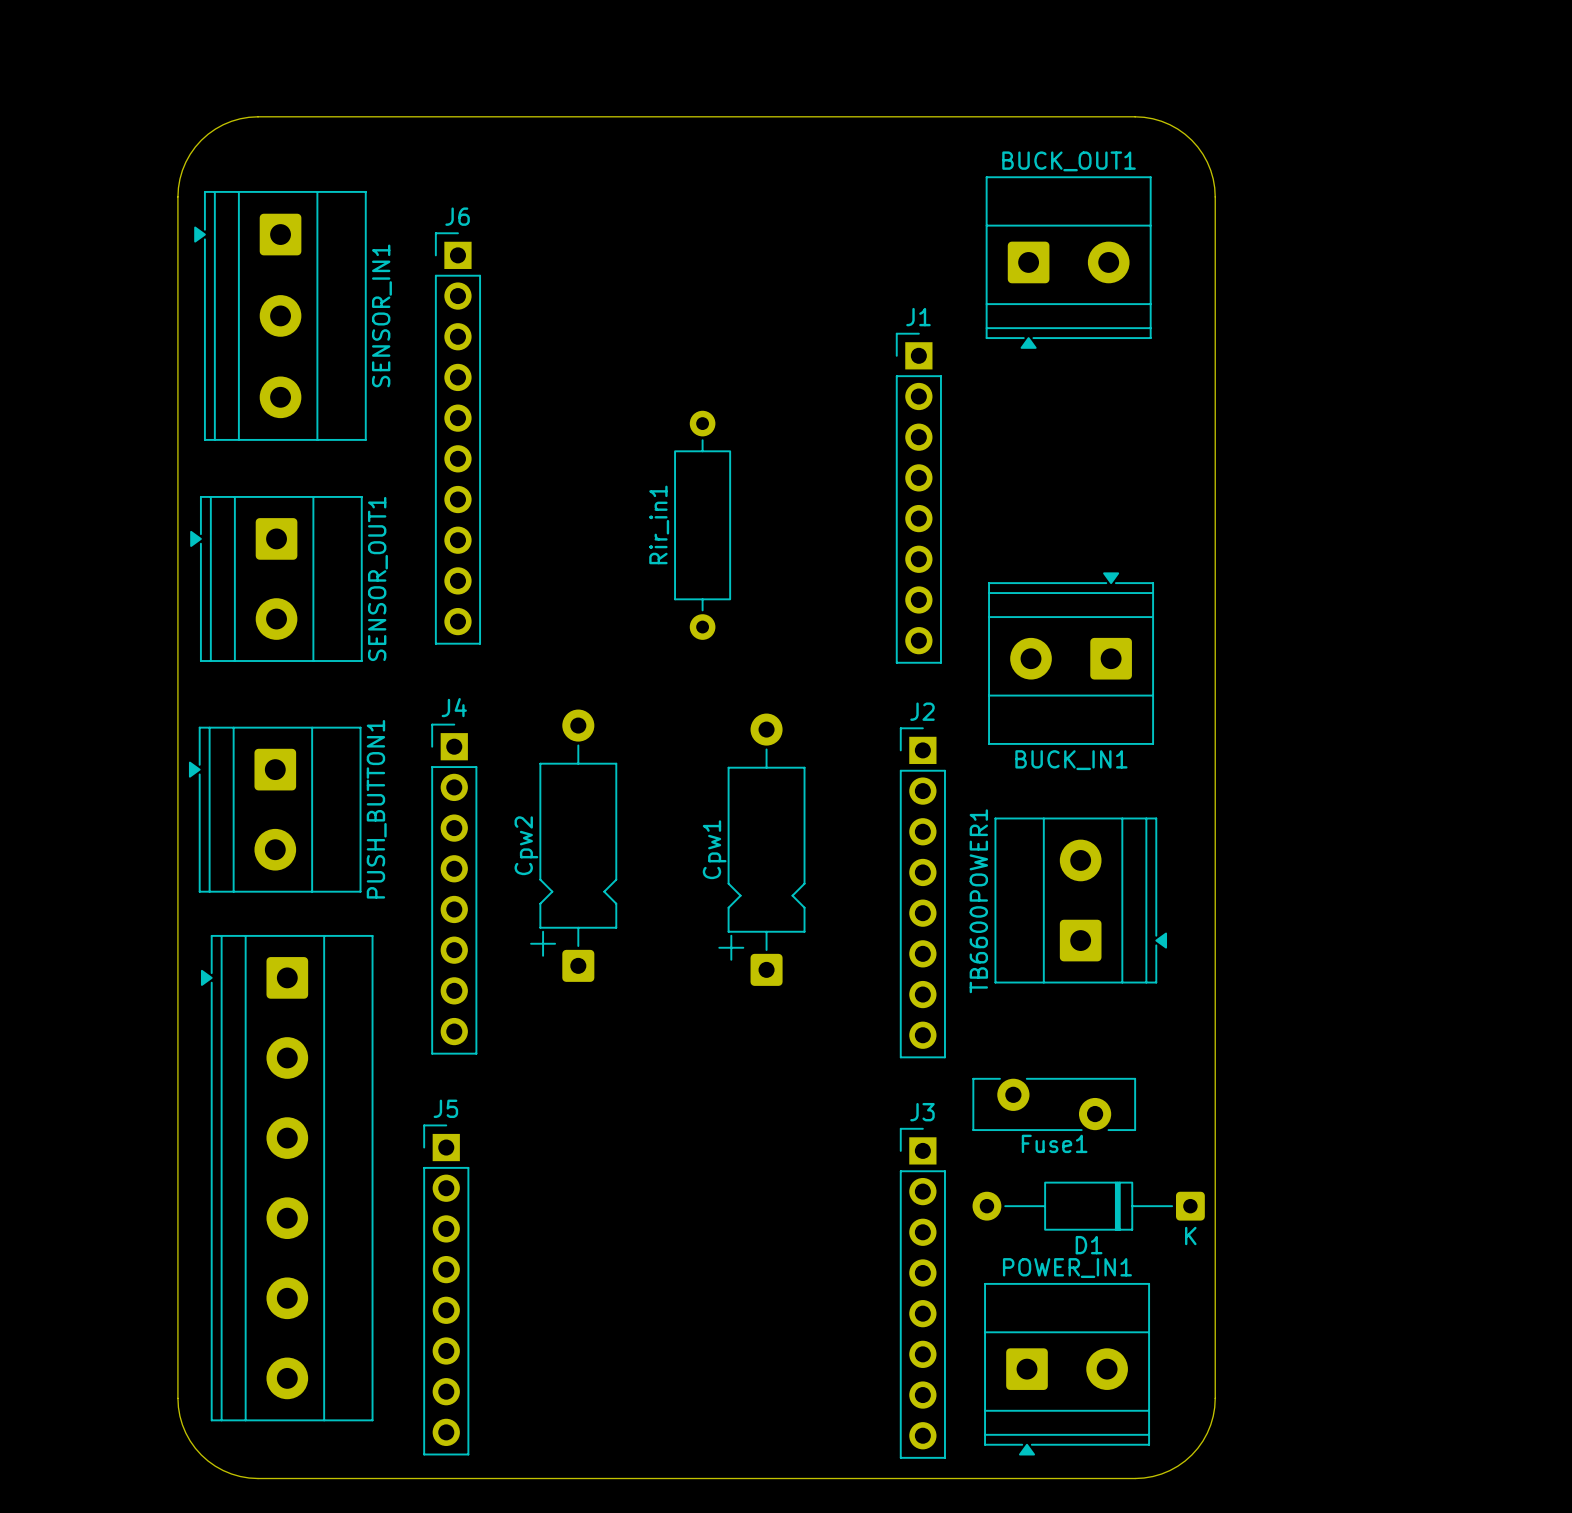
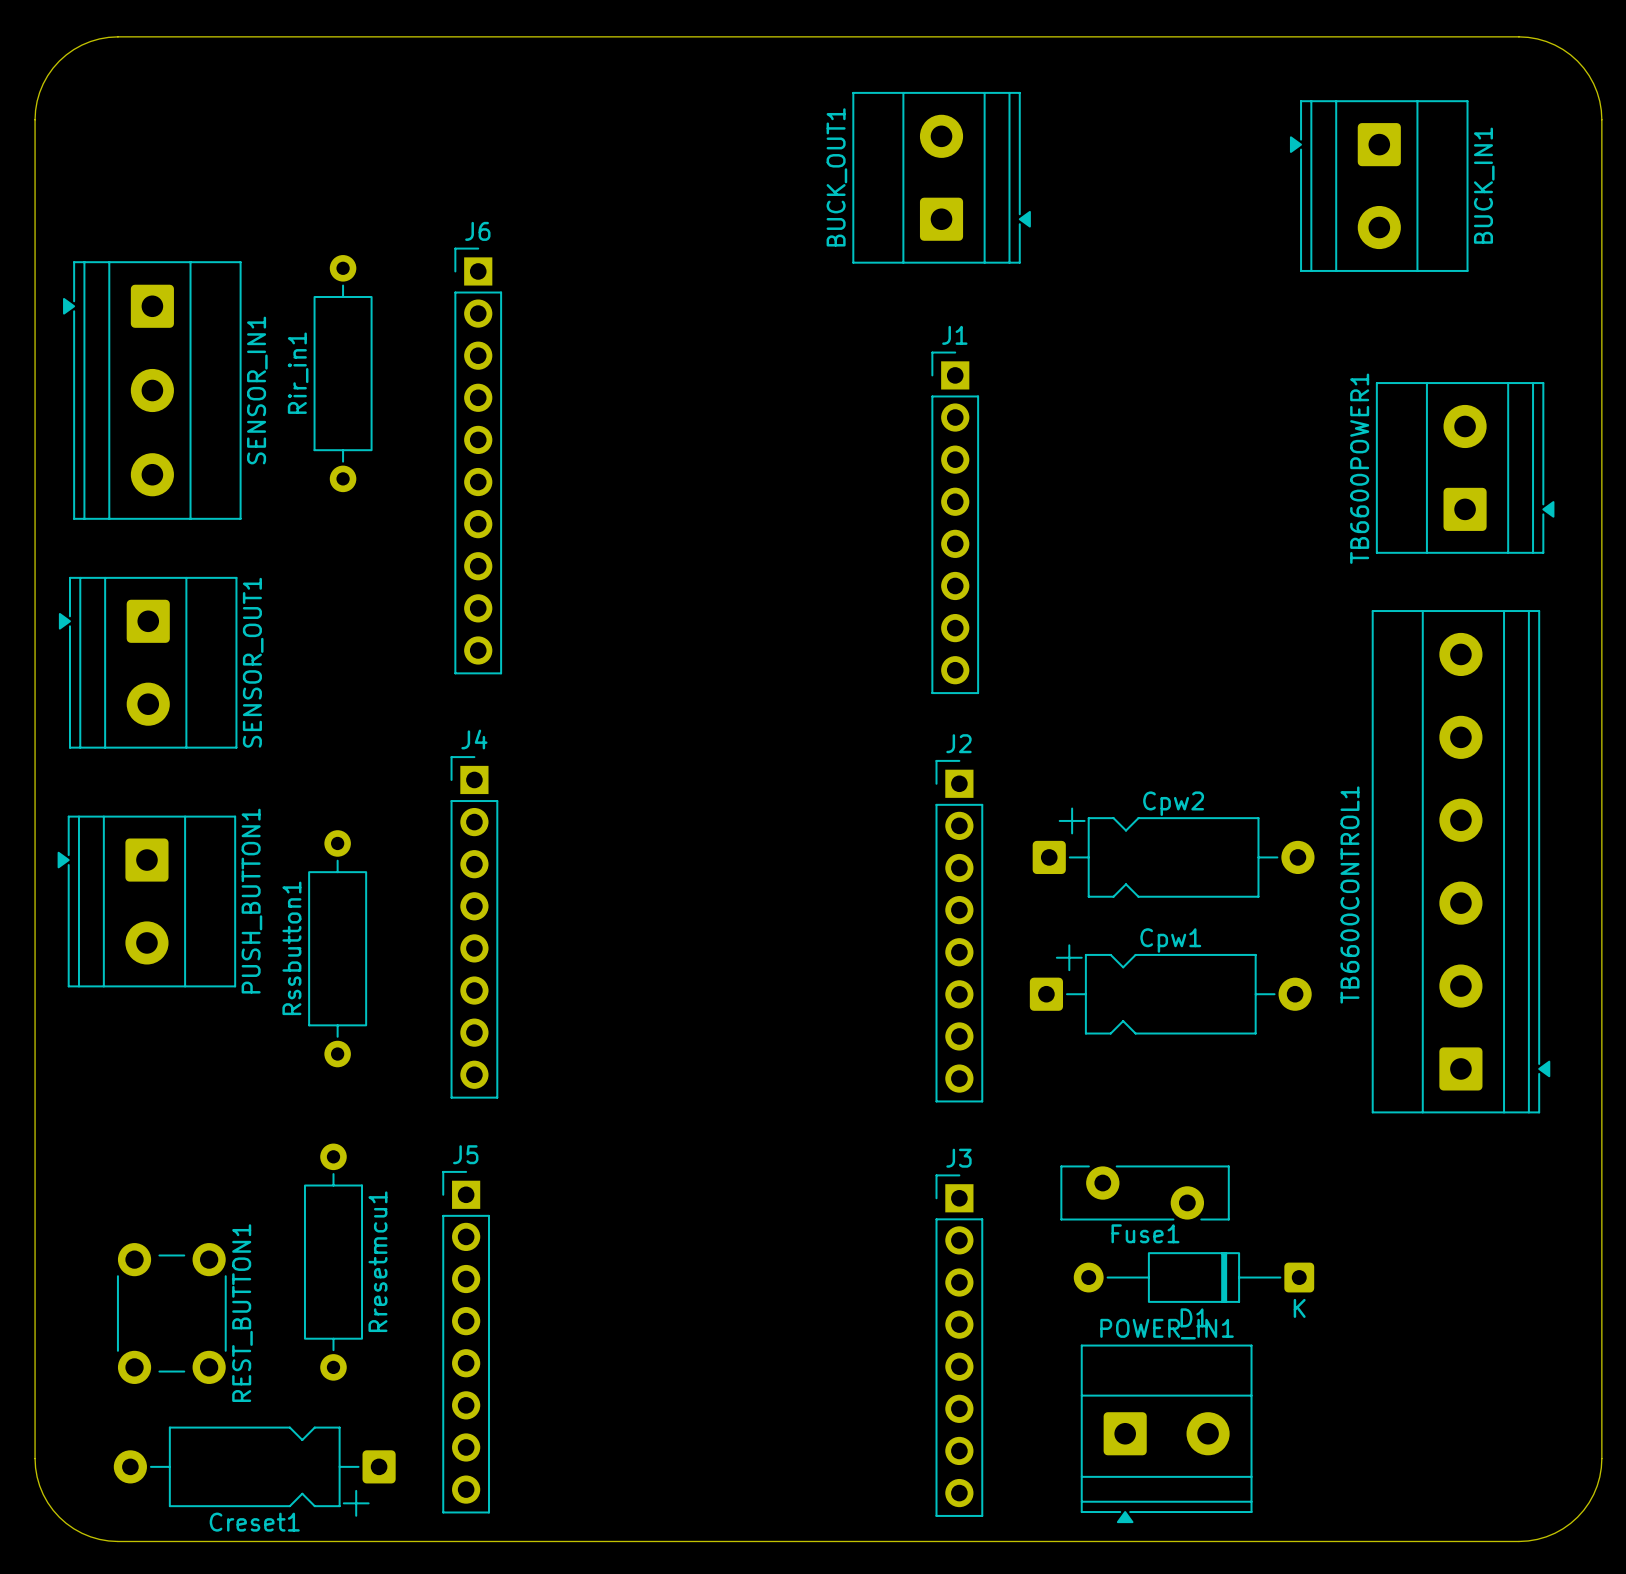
board edge: (258, 116) (1135, 116) (1161, 121) (1177, 129) (1191, 140) (1202, 154) (1213, 179) (1215, 196) (1215, 1398) (1210, 1424) (1202, 1441) (1191, 1455) (1177, 1466) (1152, 1476) (1135, 1478) (258, 1478) (240, 1476) (215, 1466) (201, 1455) (190, 1441) (179, 1416) (177, 1398) (177, 196) (182, 170) (190, 154) (201, 140) (223, 124) (240, 118) (258, 116) -> (117, 36) (90, 41) (73, 49) (59, 61) (43, 83) (37, 101) (35, 119) (35, 1458) (37, 1477) (43, 1494) (59, 1517) (81, 1533) (99, 1539) (117, 1541) (1518, 1541) (1537, 1539) (1554, 1533) (1577, 1517) (1589, 1502) (1597, 1485) (1601, 1458) (1601, 119) (1597, 92) (1589, 75) (1577, 61) (1563, 49) (1546, 41) (1518, 36) (117, 36)
BUCK_OUT1 rotation: 0° (1068, 262) -> 90° counterclockwise (941, 177)
BUCK_OUT1 position: (1068, 262) -> (941, 177)
SENSOR_IN1 position: (280, 315) -> (152, 390)
Rir_in1 position: (702, 525) -> (343, 373)
SENSOR_OUT1 position: (276, 578) -> (148, 662)
BUCK_IN1 rotation: 0° (1071, 658) -> 90° counterclockwise (1379, 186)
BUCK_IN1 position: (1071, 658) -> (1379, 186)
PUSH_BUTTON1 position: (275, 809) -> (146, 901)
TB6600CONTROL1: none -> (1461, 861)
Cpw2 rotation: 0° (573, 845) -> 90° clockwise (1173, 852)
Cpw2 position: (573, 845) -> (1173, 852)
Cpw1 rotation: 0° (761, 849) -> 90° clockwise (1170, 989)
Cpw1 position: (761, 849) -> (1170, 989)
TB6600POWER1 position: (1080, 900) -> (1465, 467)
Rssbutton1: none -> (337, 948)
Fuse1 position: (1054, 1104) -> (1145, 1192)
part: (287, 1178) -> none
D1 position: (1088, 1206) -> (1193, 1277)
Rresetmcu1: none -> (333, 1262)
REST_BUTTON1: none -> (171, 1313)
POWER_IN1 position: (1067, 1369) -> (1166, 1433)
Creset1: none -> (254, 1471)

